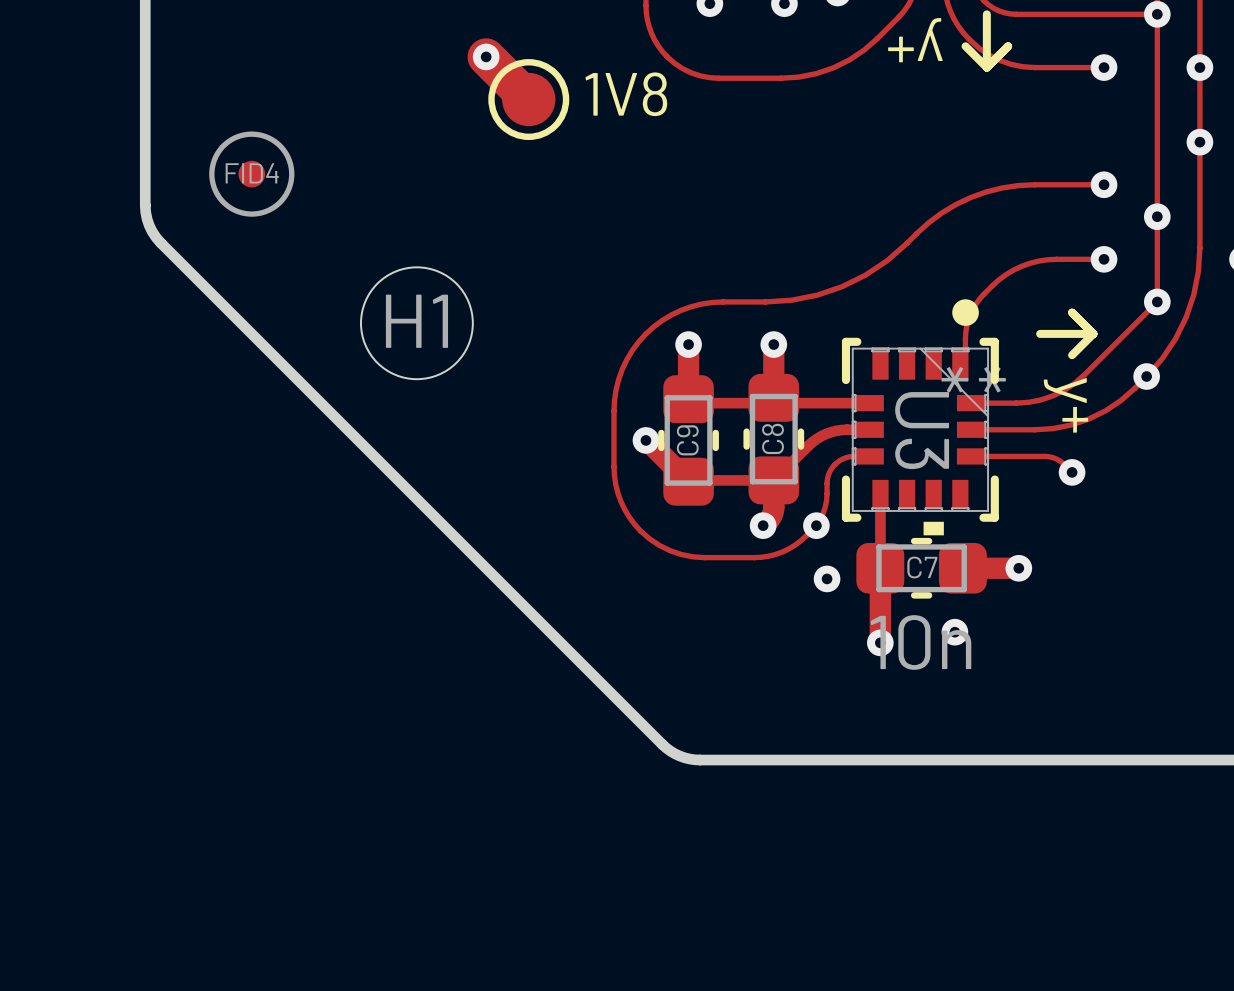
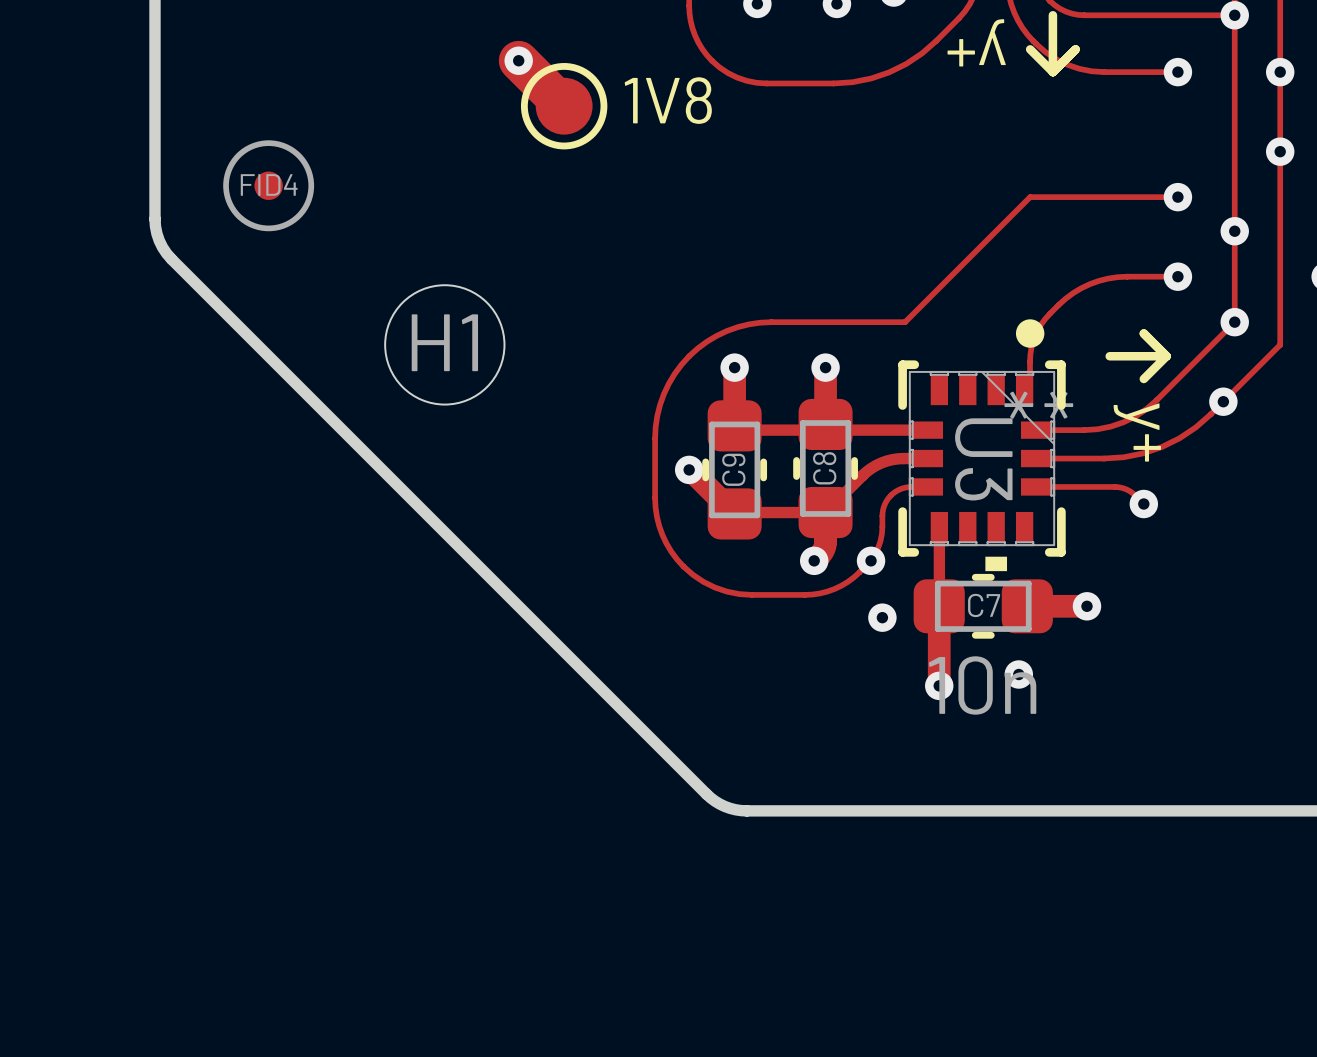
track: (1034, 184) (1002, 187) (970, 197) (941, 212) (916, 233) -> (1104, 197) (1030, 197) (977, 249)
track: (906, 243) (887, 260) (865, 275) (842, 286) (817, 295) (791, 300) (765, 301) -> (967, 259) (905, 322) (816, 322)
track: (1199, 247) (1198, 271) (1193, 294) (1186, 317) (1175, 338) (1162, 358) (1146, 376) -> (1280, 264) (1280, 344) (1223, 401)

